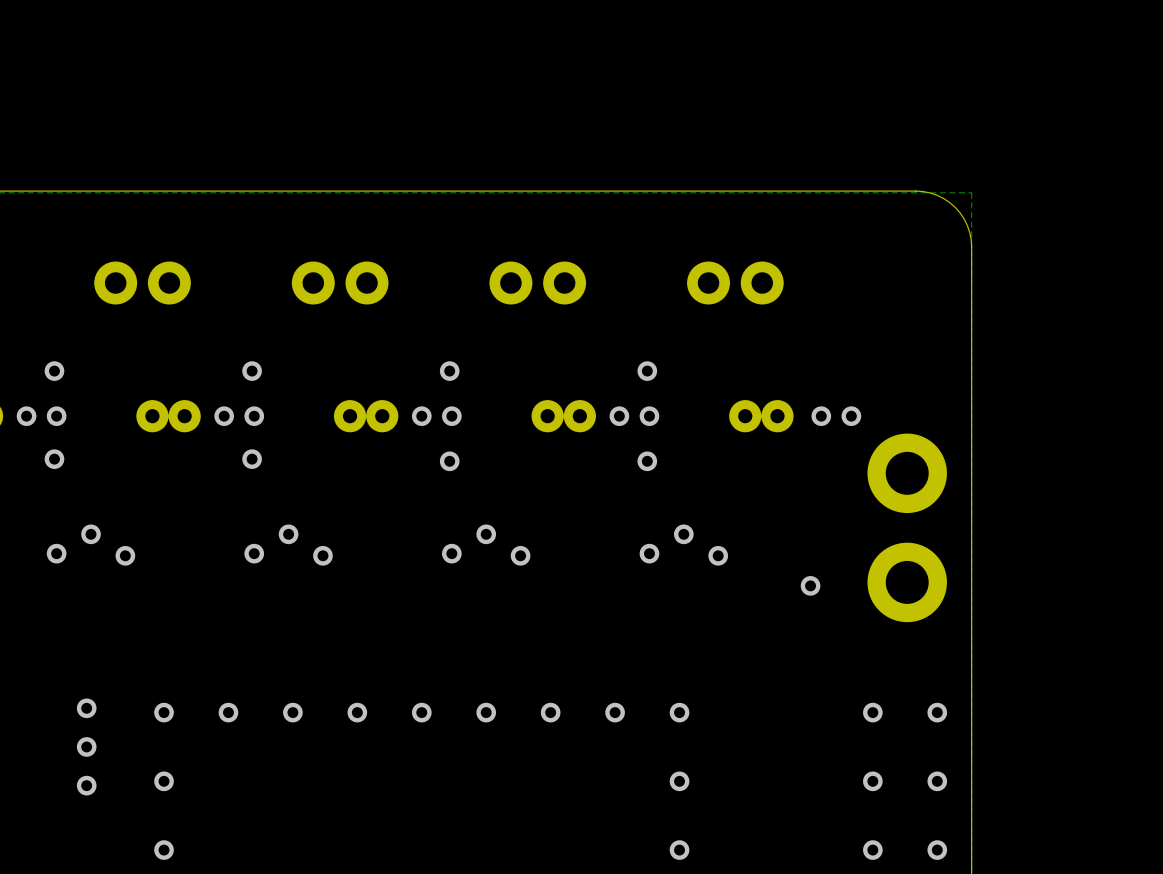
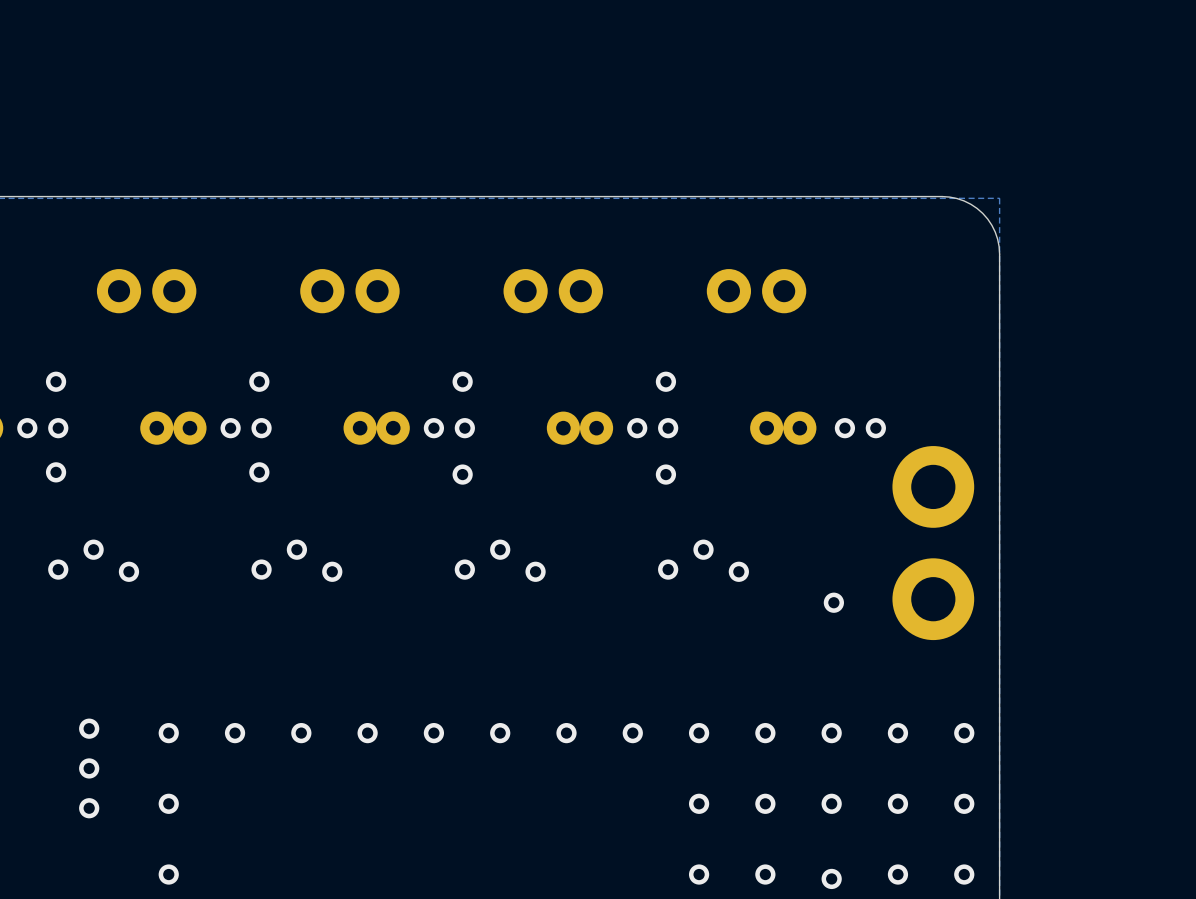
via: none -> (765, 733)
via: none -> (831, 733)
via: none -> (765, 803)
via: none -> (831, 803)
via: none -> (765, 874)
via: none -> (831, 878)

